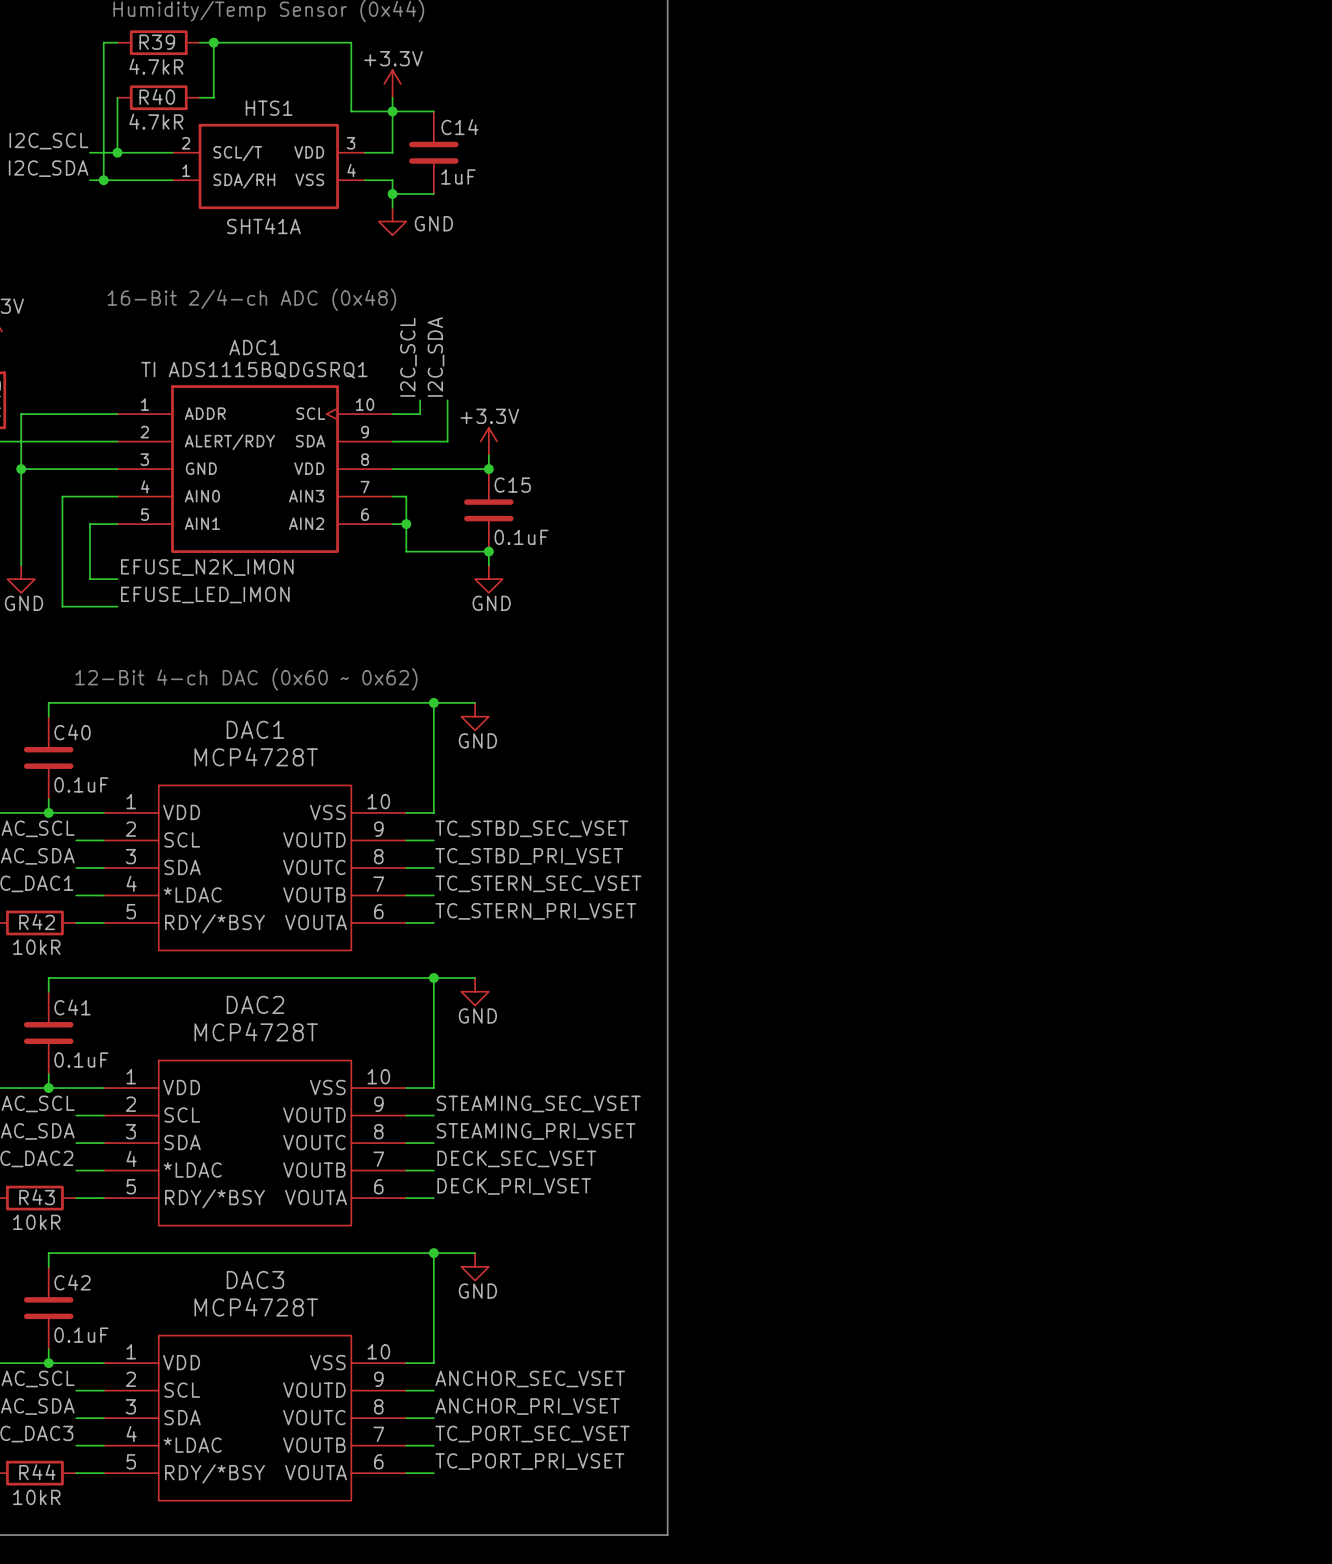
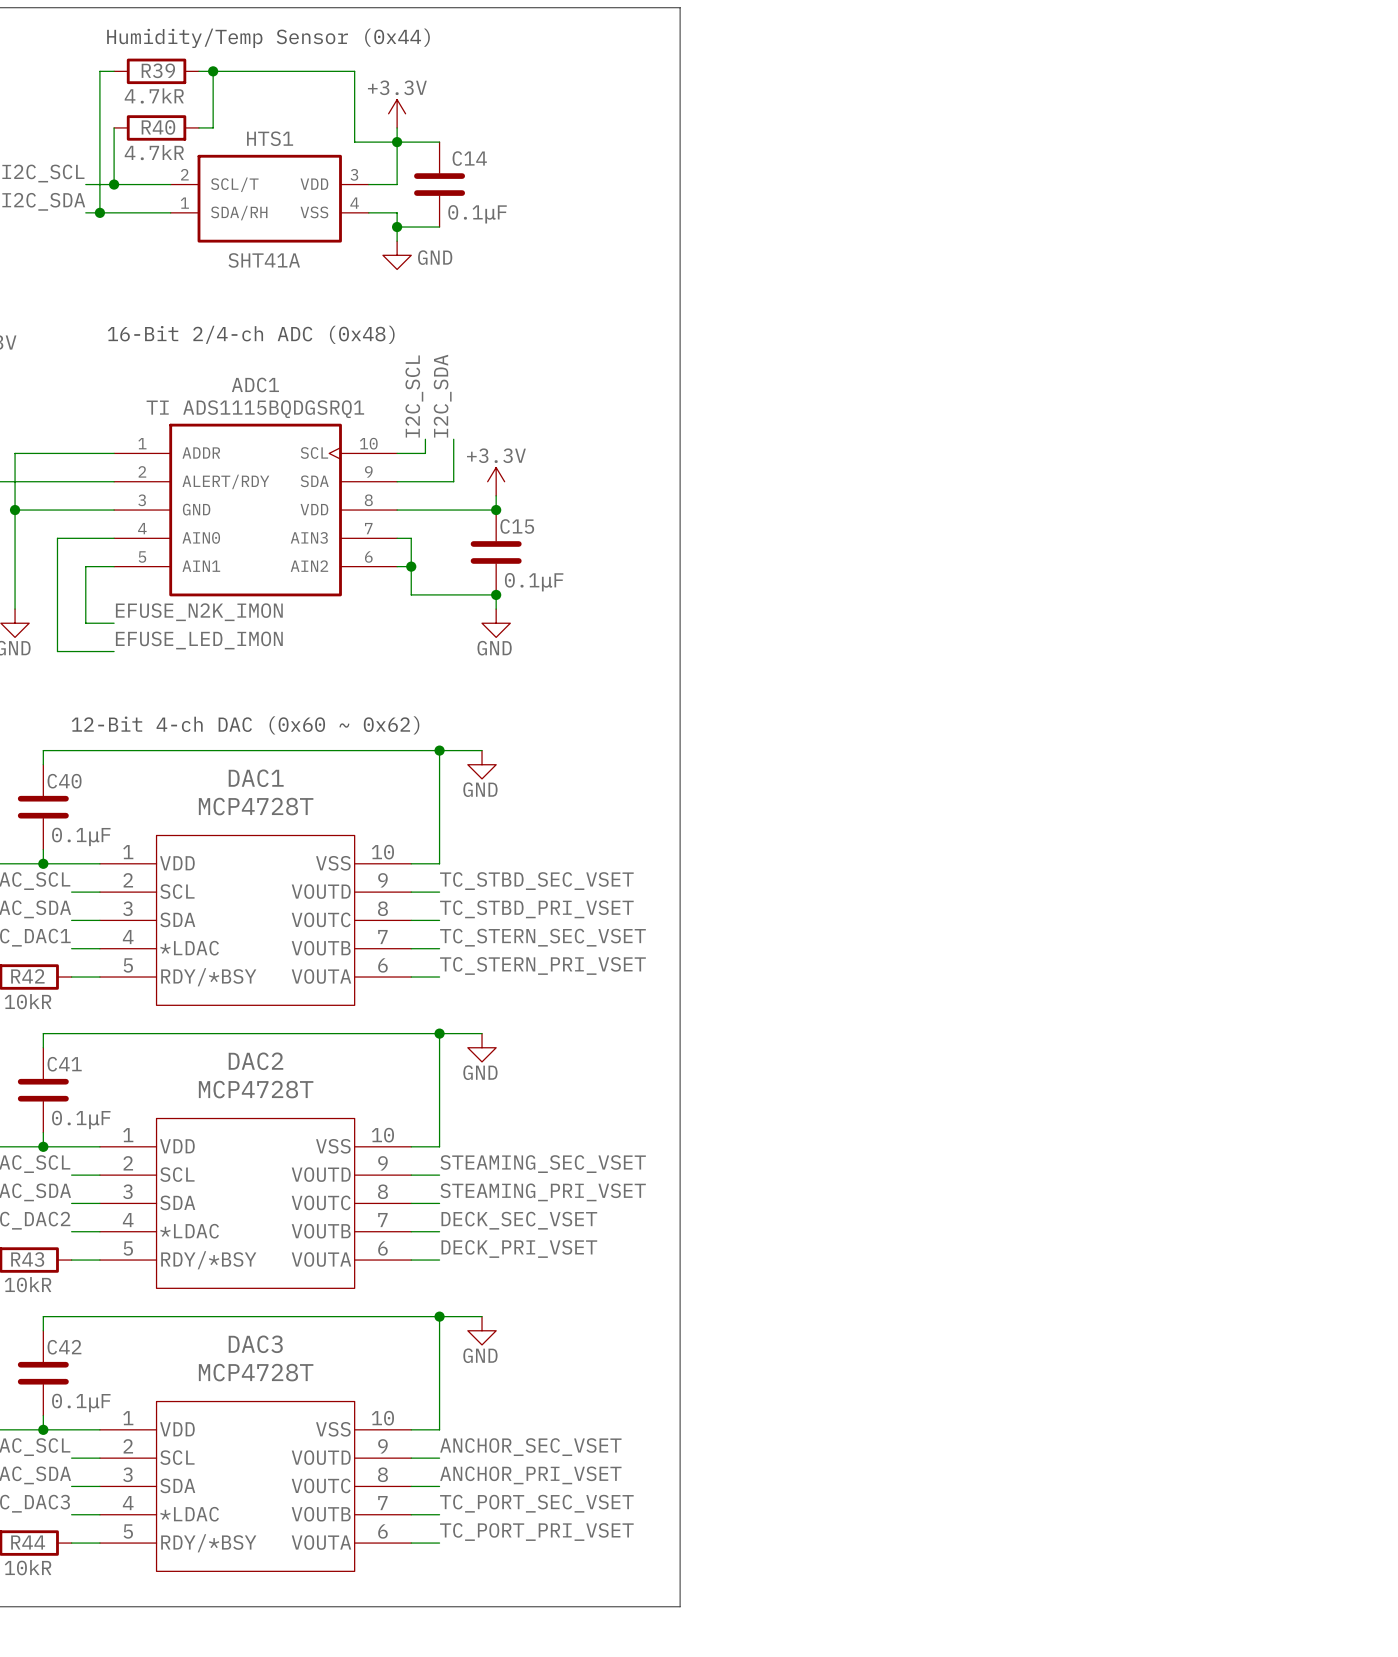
C14 value: 1uF (458, 176) -> 0.1μF (477, 214)
C15 value: 0.1uF (521, 537) -> 0.1μF (534, 582)
C40 value: 0.1uF (81, 784) -> 0.1μF (81, 836)
C41 value: 0.1uF (81, 1060) -> 0.1μF (81, 1119)
C42 value: 0.1uF (81, 1335) -> 0.1μF (81, 1402)

